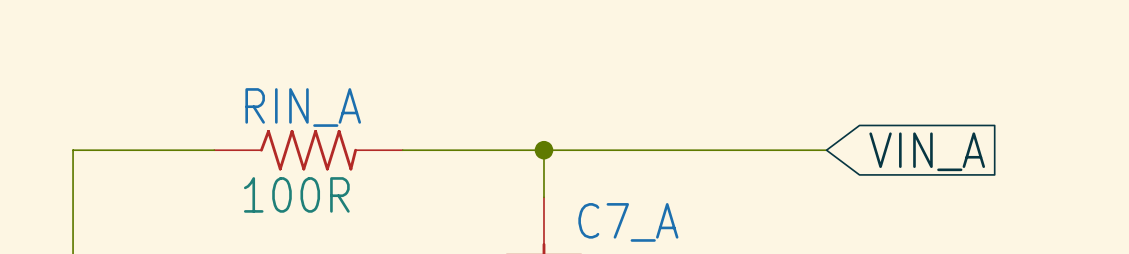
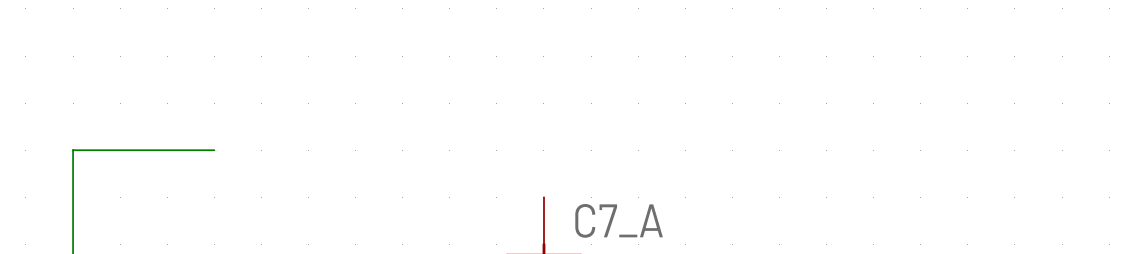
RIN_A: 100R (308, 150) -> none
wire: (402, 150) (826, 150) -> none
wire: (543, 150) (543, 197) -> none
junction: (543, 150) -> none
global label: VIN_A (927, 151) -> none

